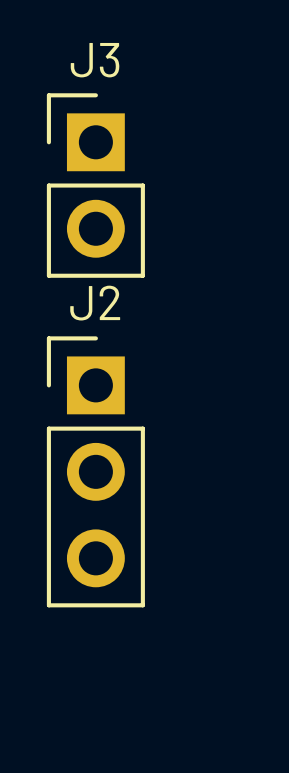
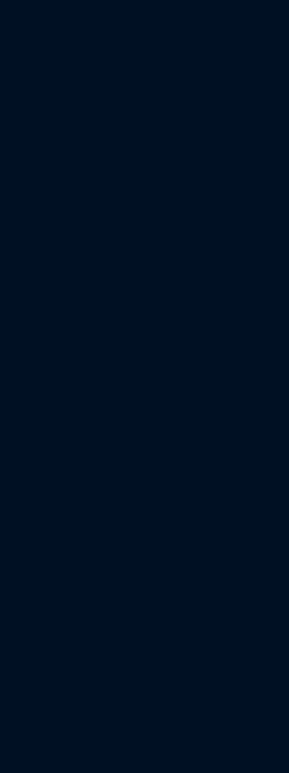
J3: (95, 185) -> none
J2: (95, 471) -> none

